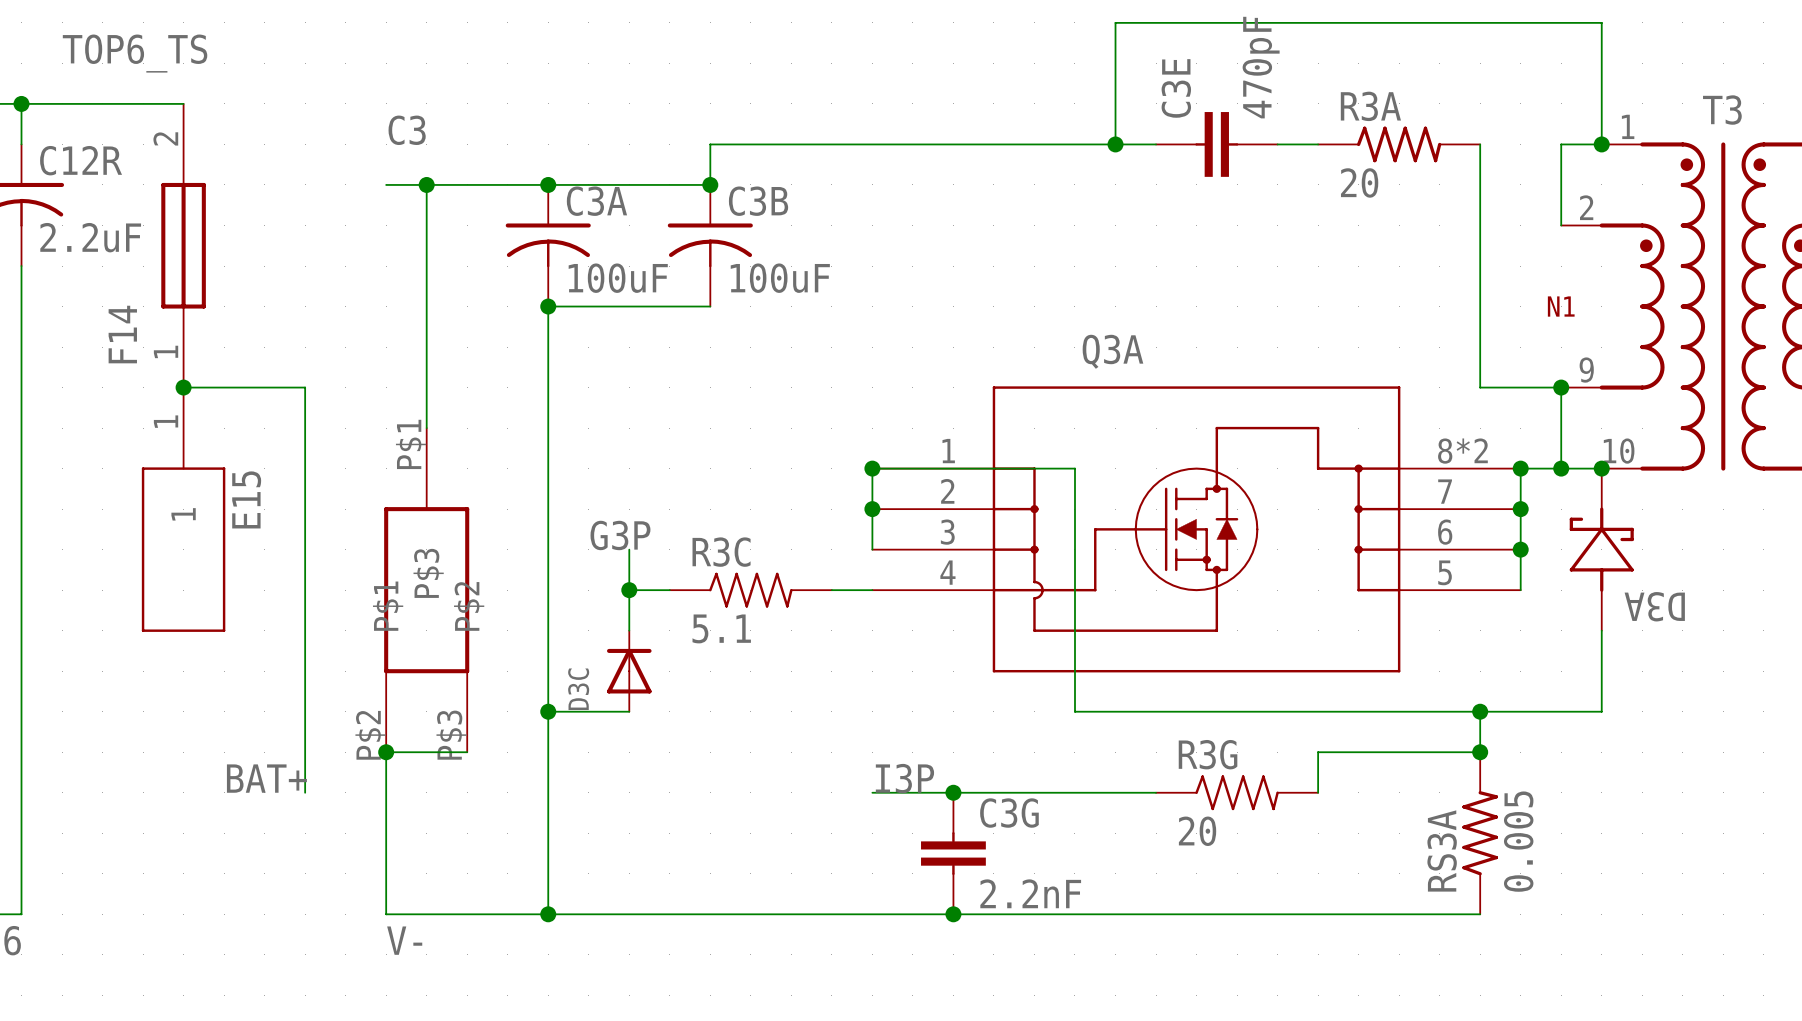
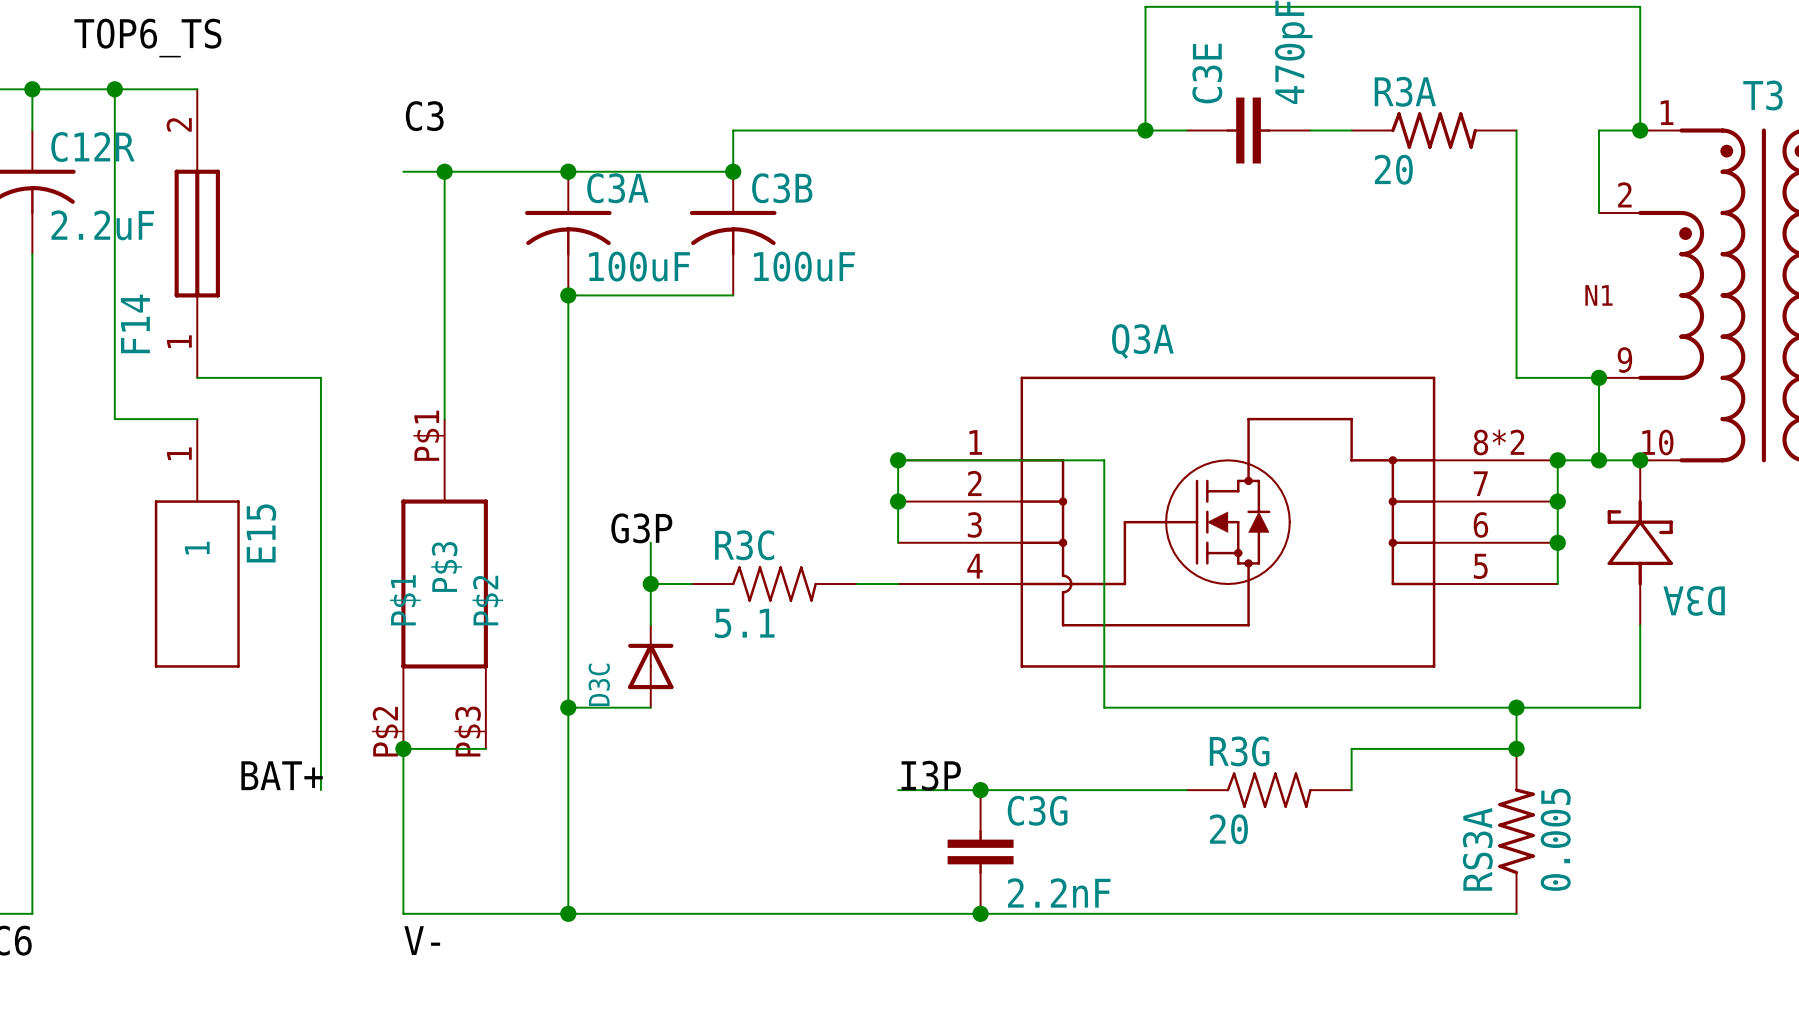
wire: none -> (114, 89) (114, 419) (197, 419)
junction: none -> (114, 89)
junction: (183, 387) -> none
E15 position: (183, 509) -> (197, 543)

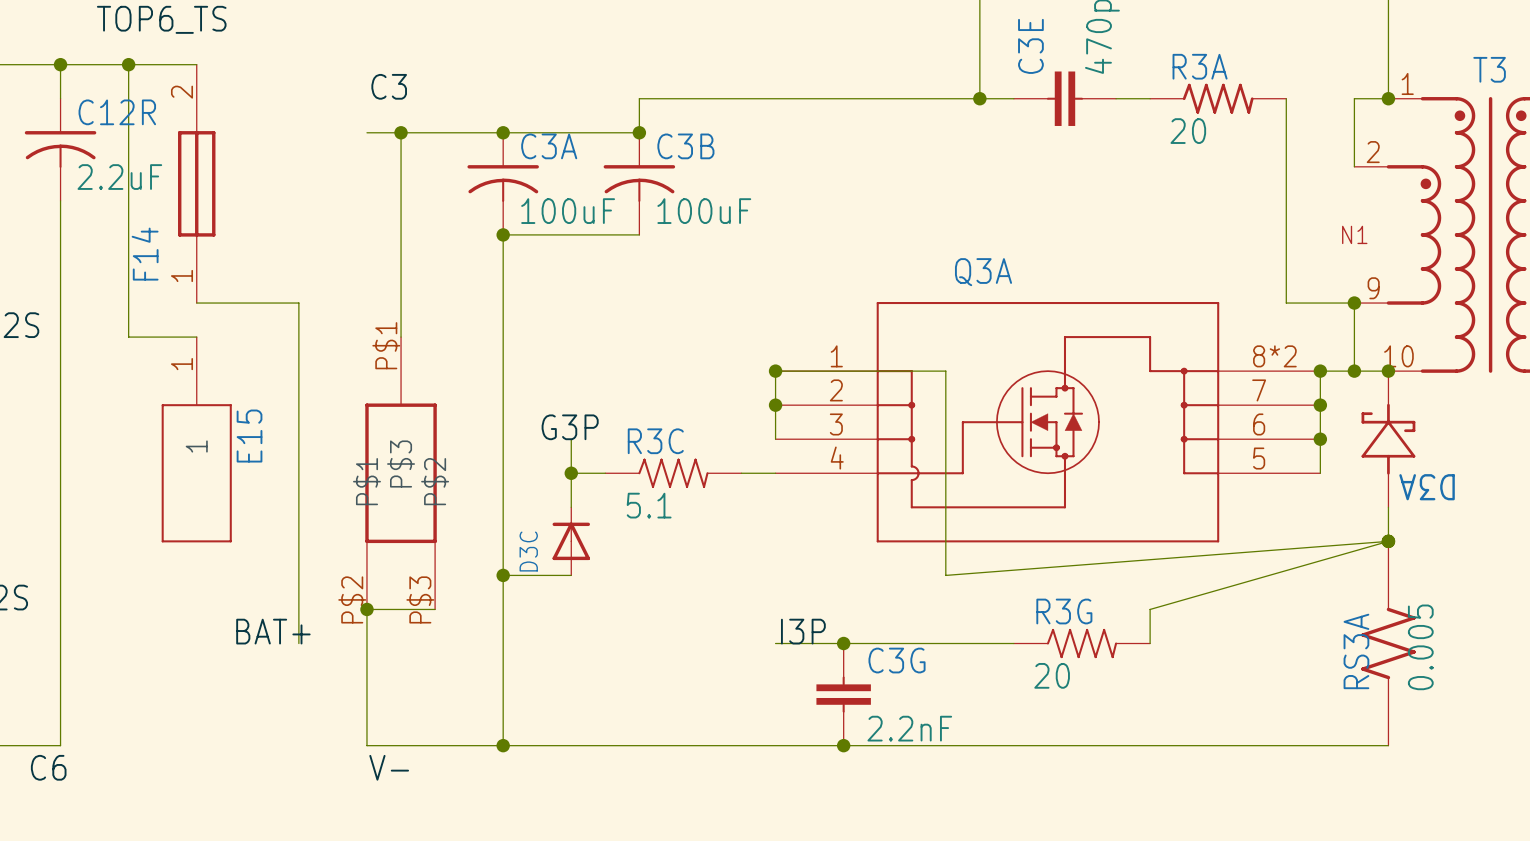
wire: (1640, 666) (1640, 707) (1104, 707) -> (1150, 609) (1388, 541) (945, 575)
junction: none -> (1388, 541)
wire: (1516, 707) (1516, 748) (1351, 748) -> none
junction: (1516, 707) -> none
RS3A symbol: [1498, 748, 1535, 914] -> [1361, 541, 1416, 746]
junction: (1516, 748) -> none
wire: none -> (1286, 745) (1388, 745)

